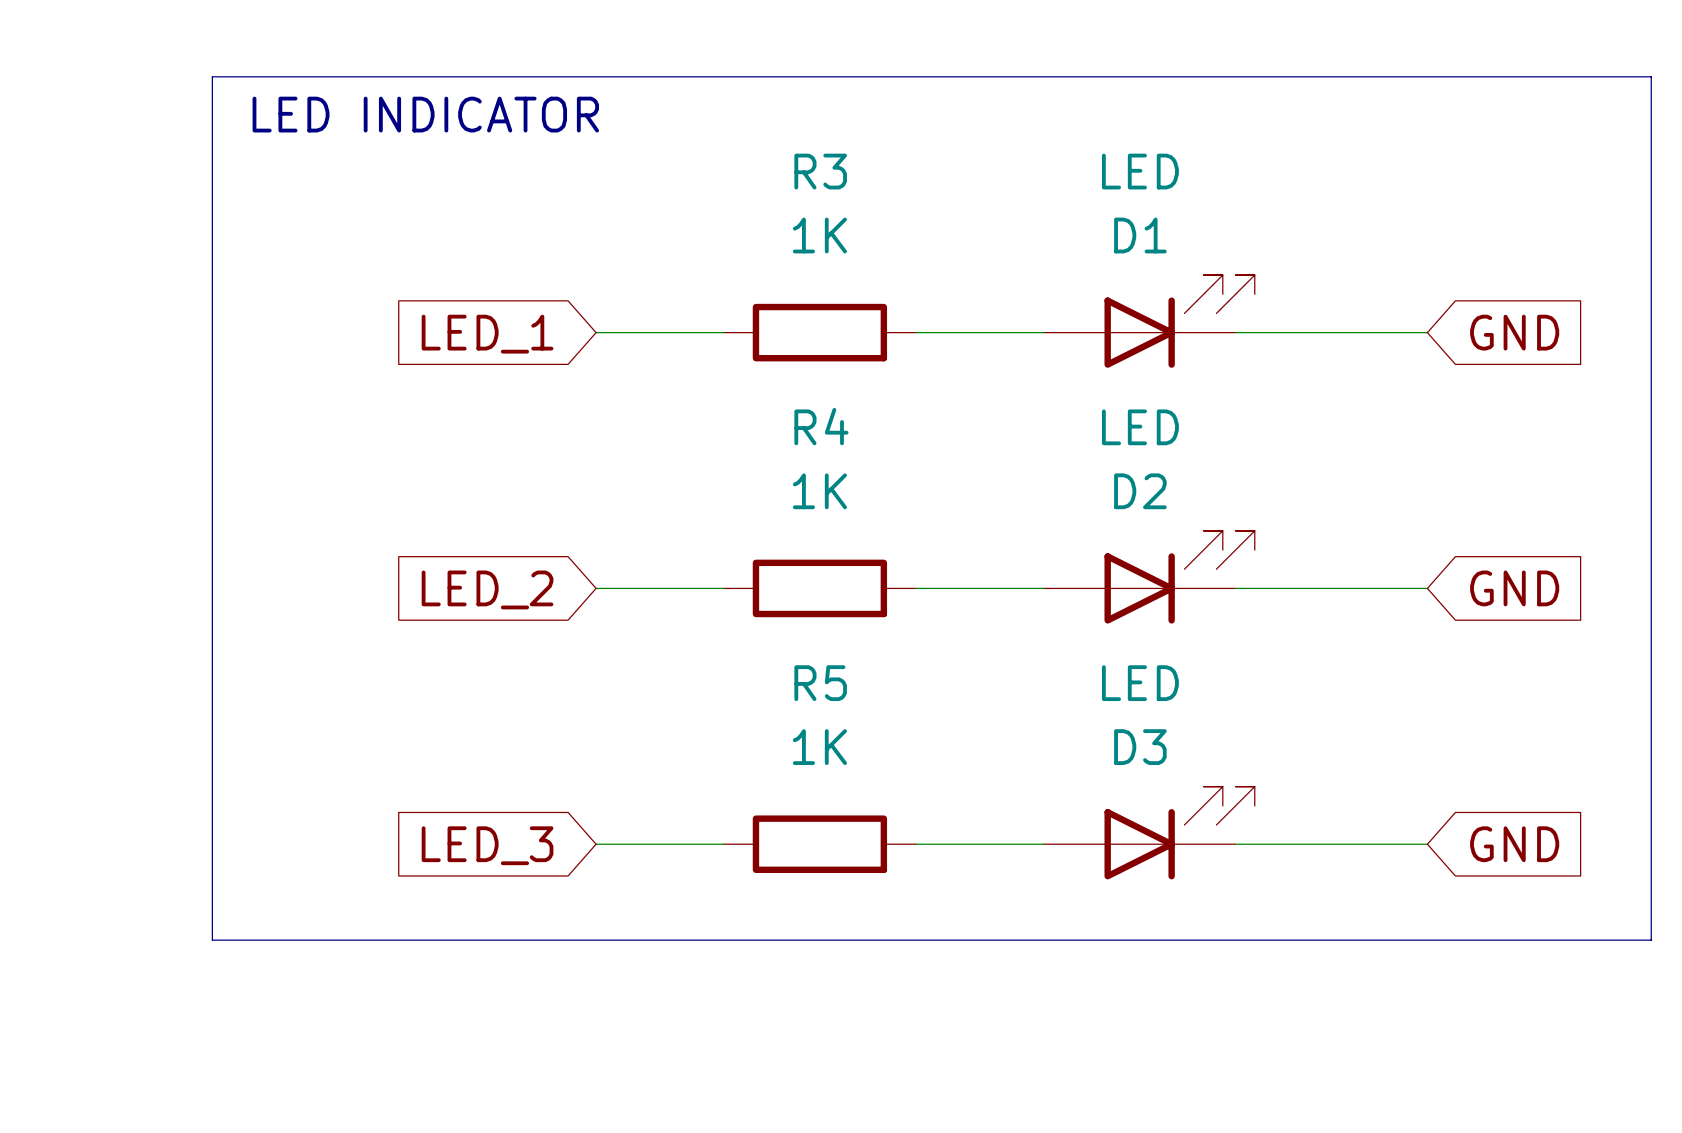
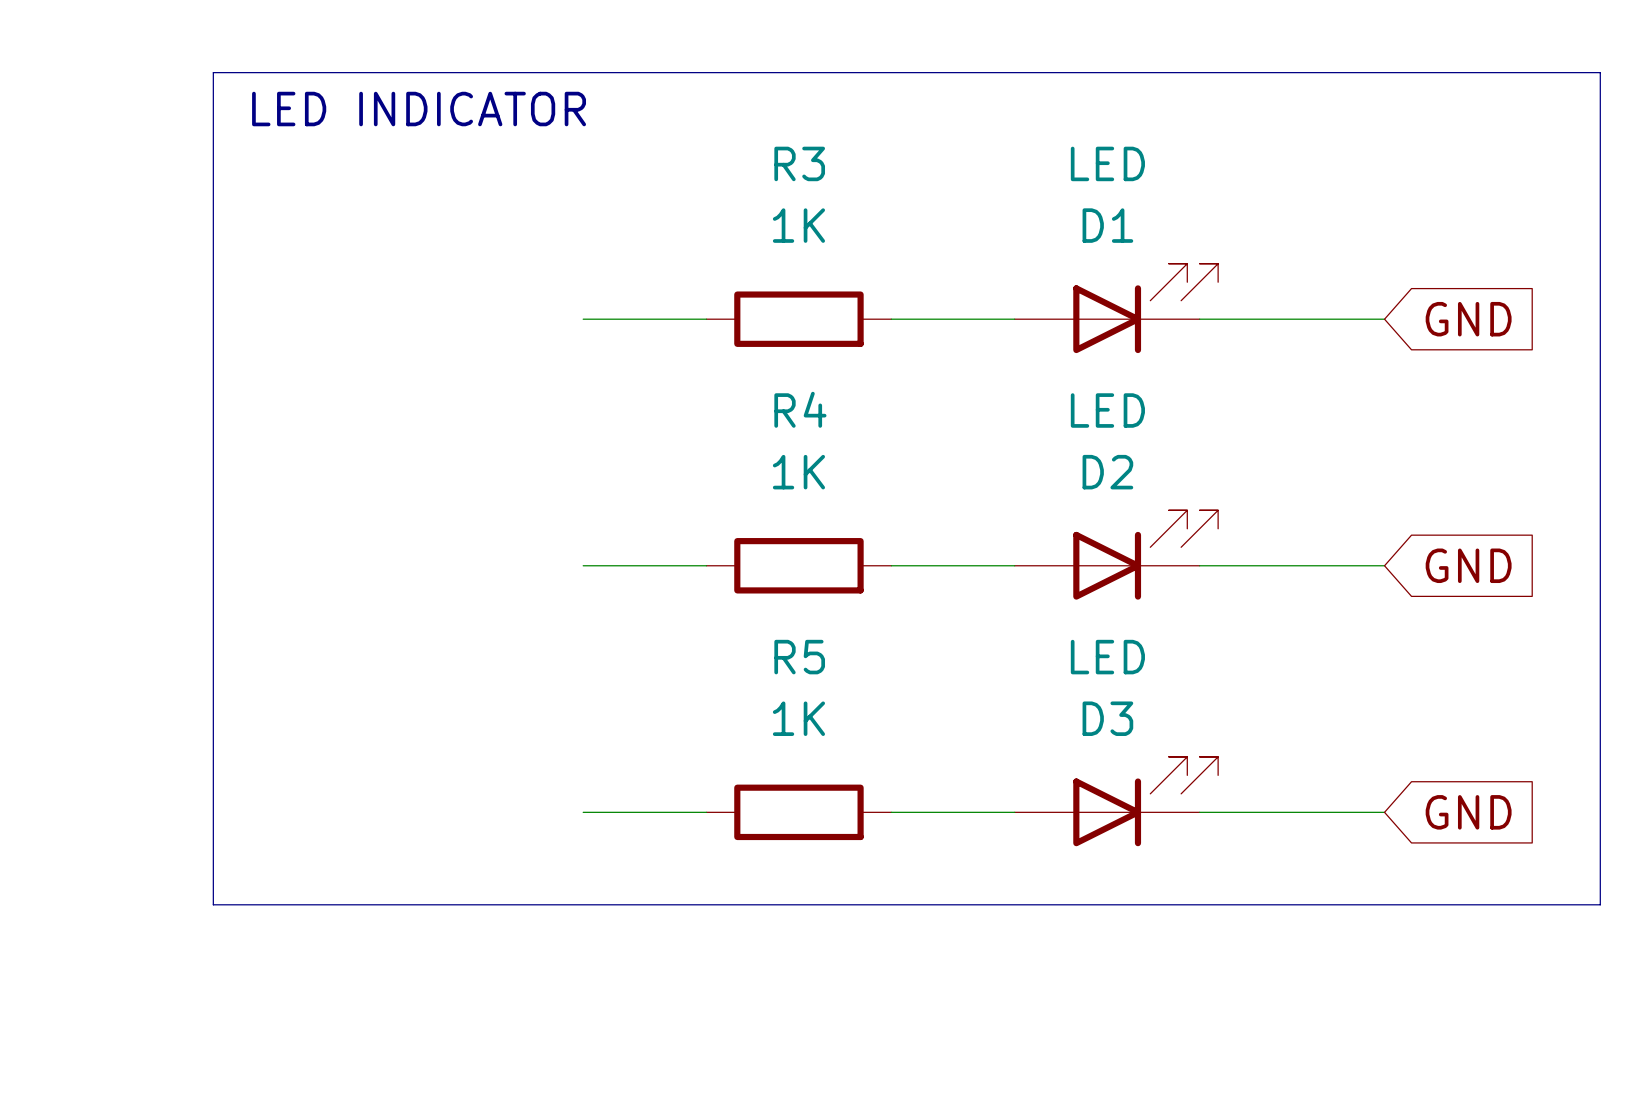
global label: LED_1 (487, 334) -> none
global label: LED_2 (487, 589) -> none
global label: LED_3 (487, 845) -> none

